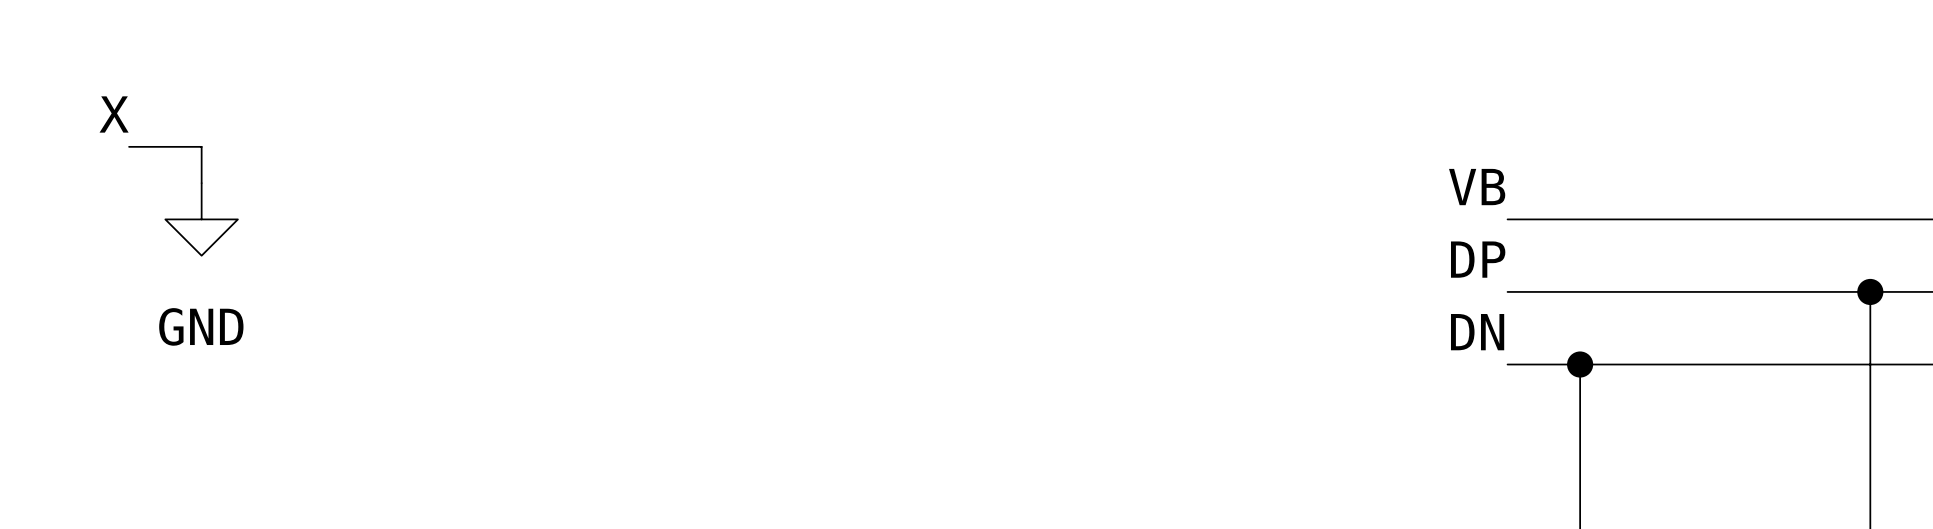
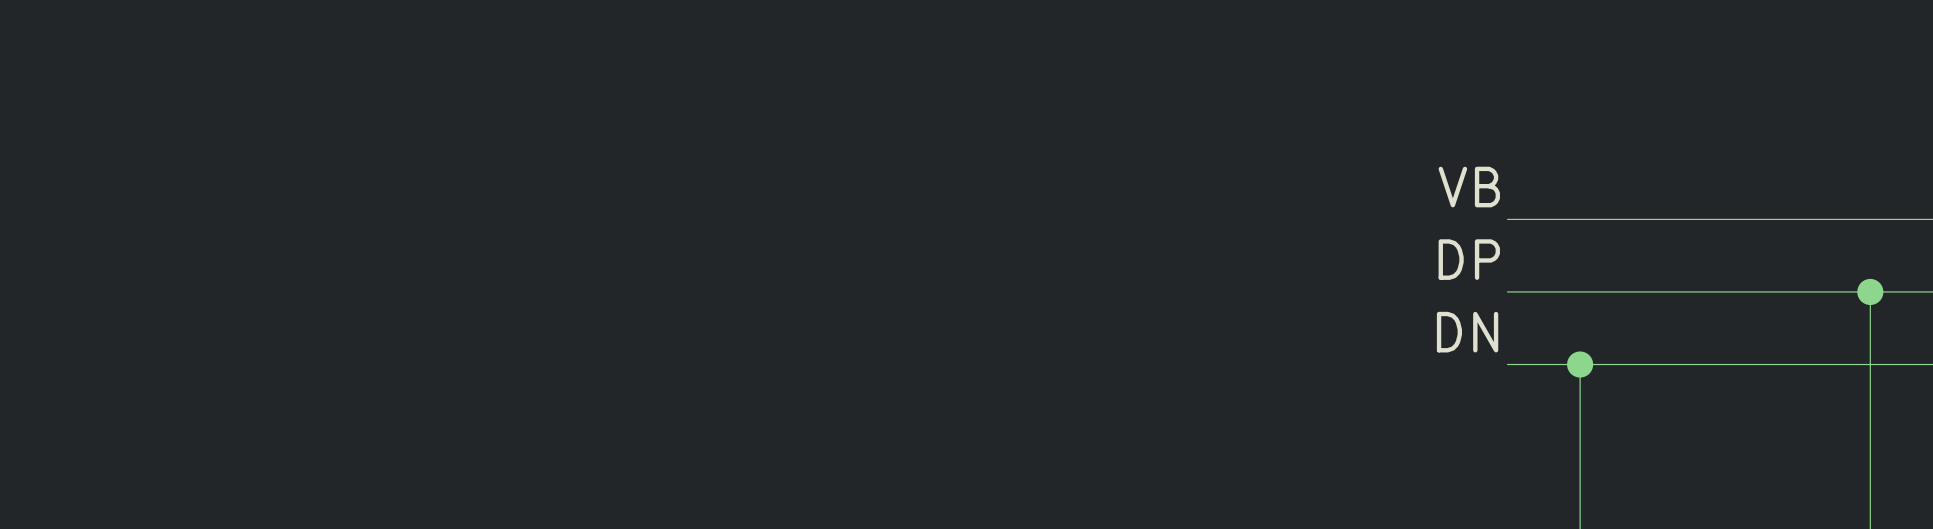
label: X (114, 114) -> none
wire: (129, 146) (201, 146) (201, 183) -> none
power symbol: GND (201, 219) -> none

